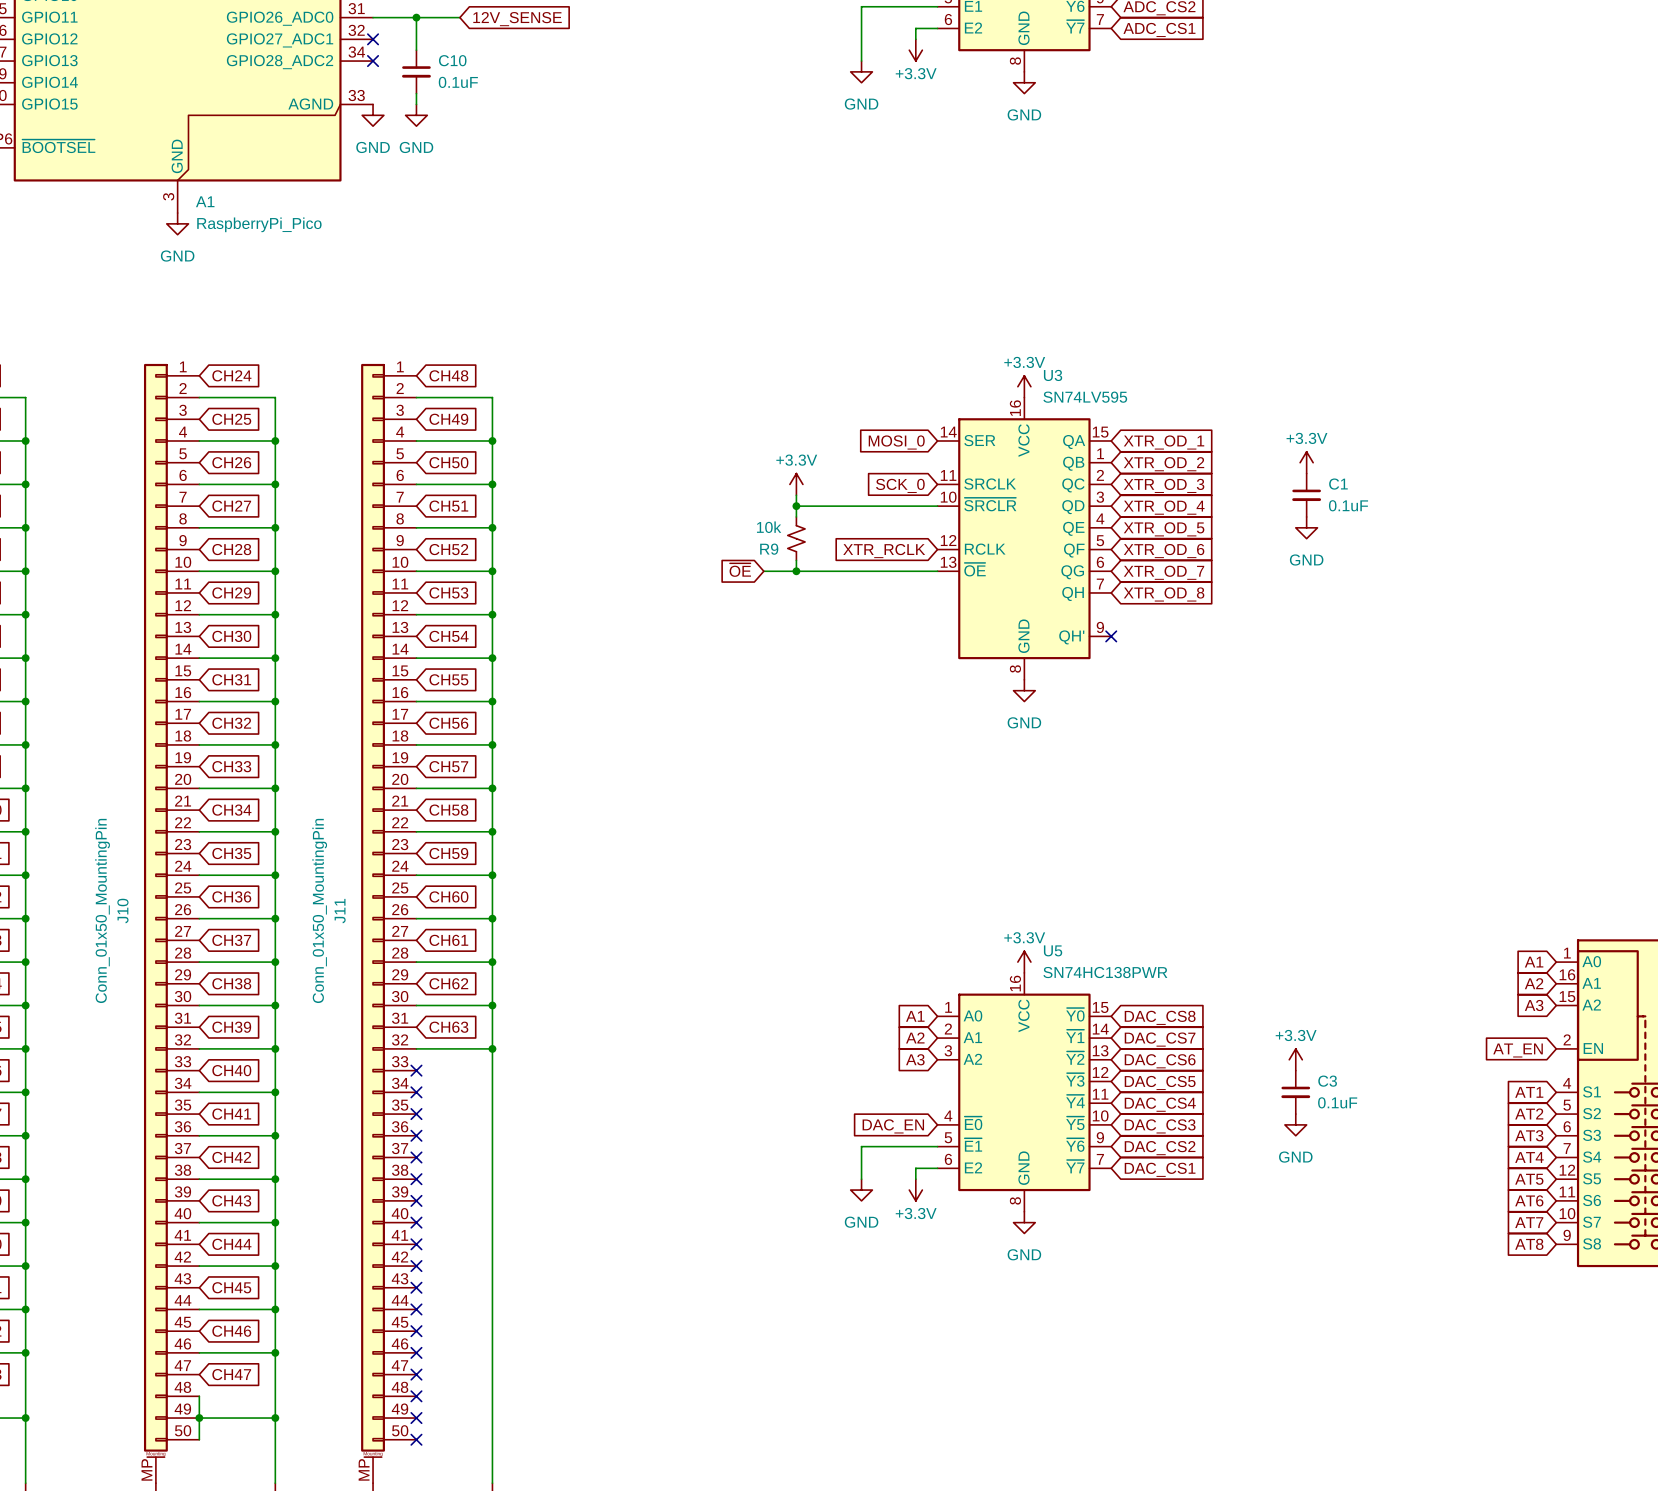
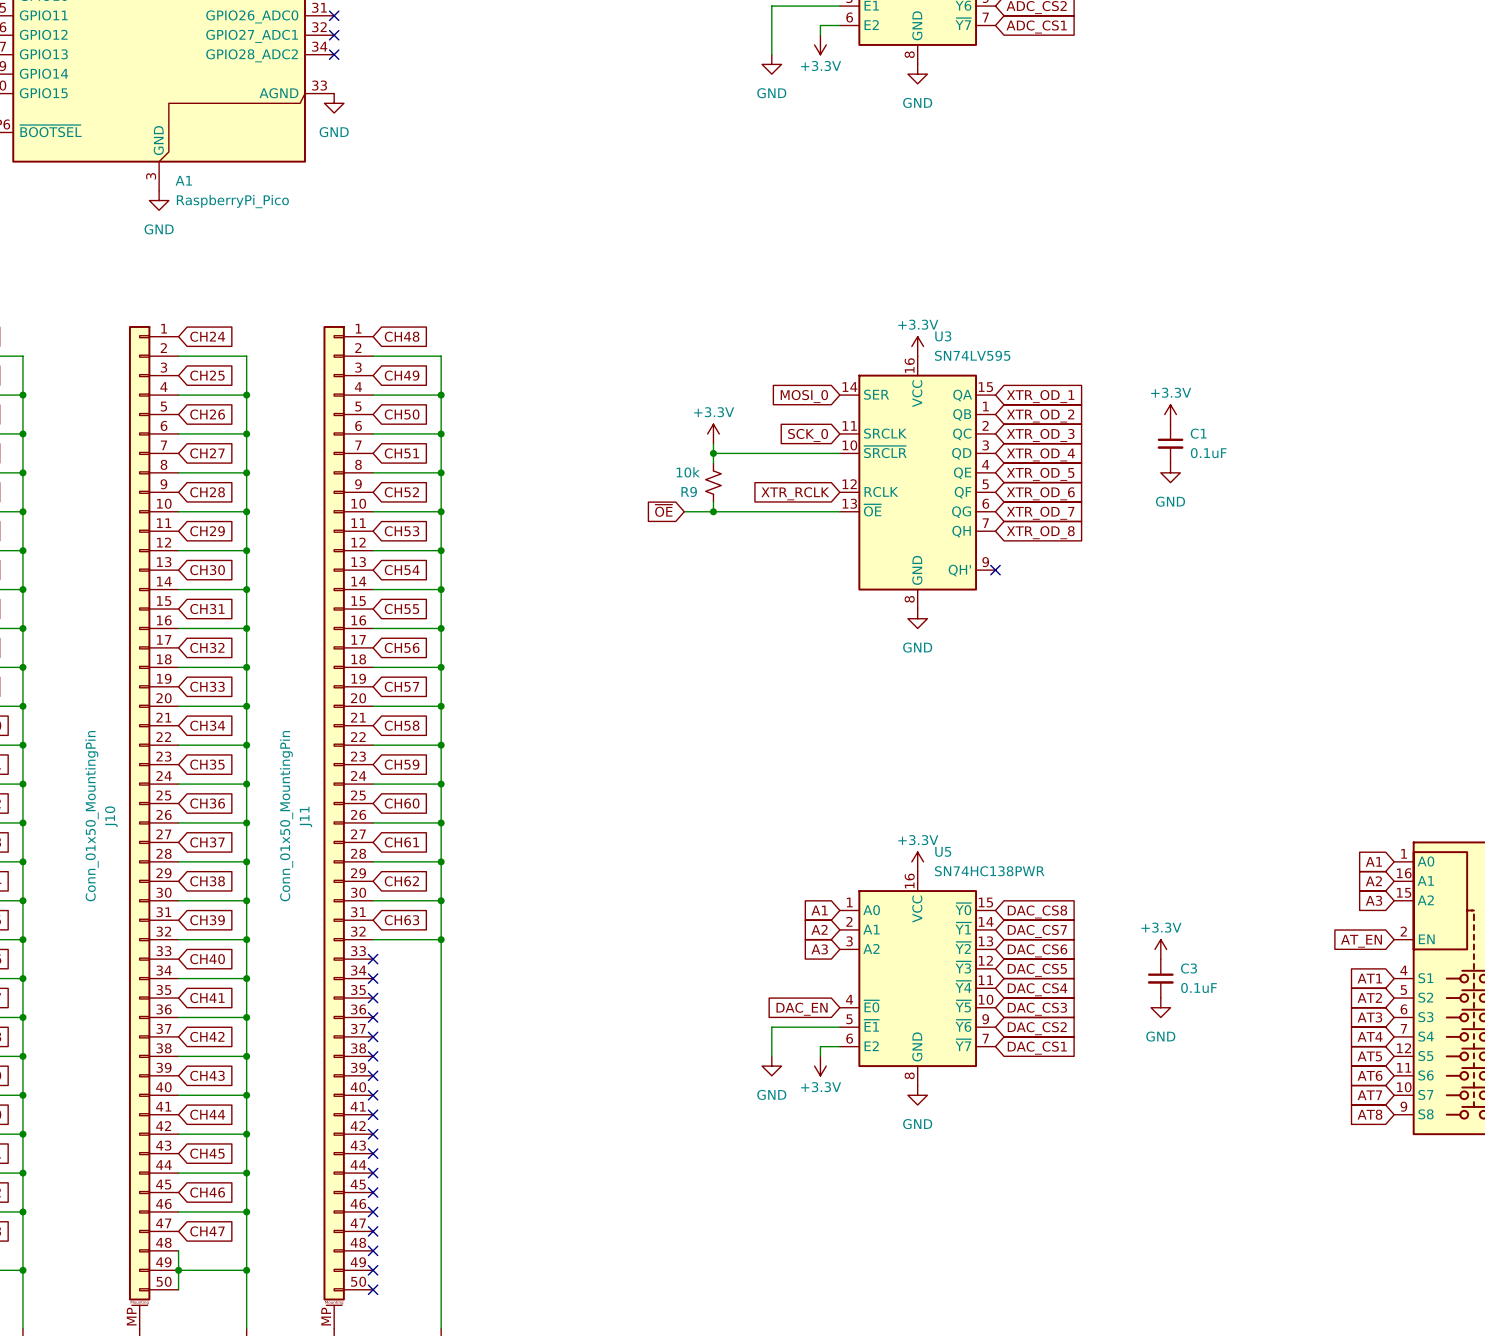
wire: (373, 17) (459, 17) -> none
no-connect mark: none -> (334, 15)
wire: (416, 17) (416, 50) -> none
junction: (416, 17) -> none
global label: 12V_SENSE (517, 19) -> none
C10: 0.1uF (416, 71) -> none
wire: (416, 93) (416, 104) -> none
power symbol: GND (416, 115) -> none

